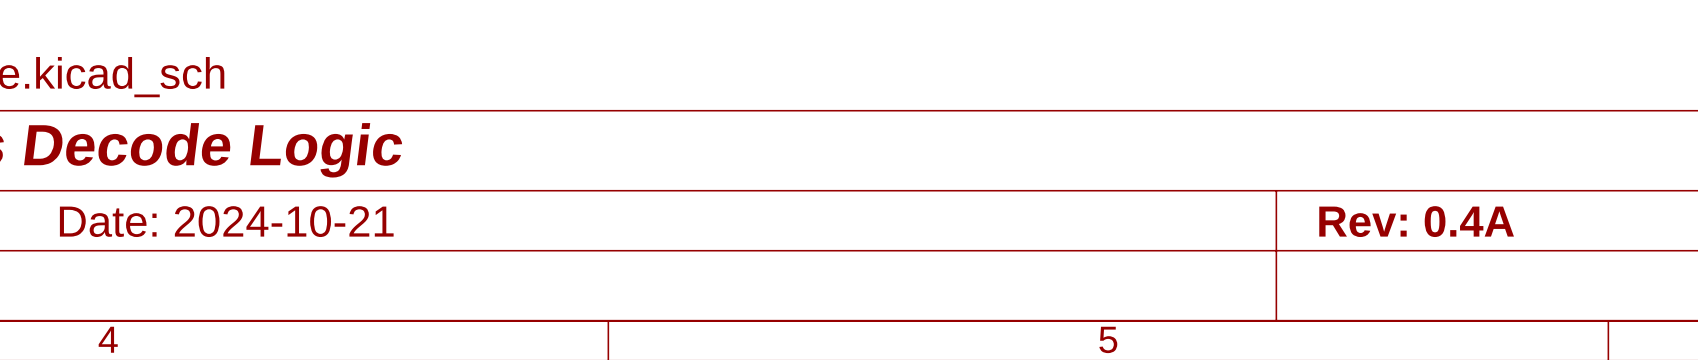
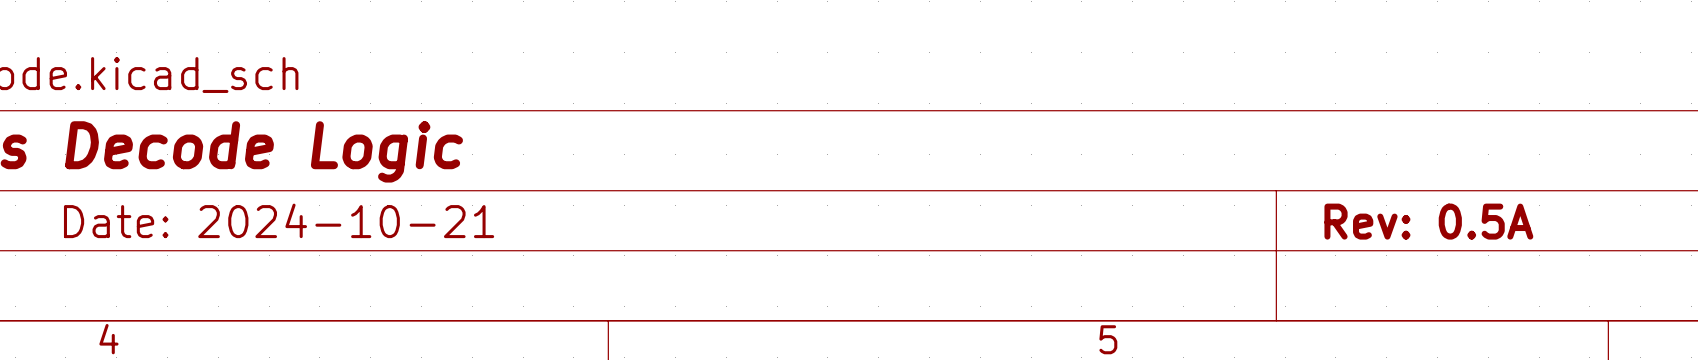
title block: Rev: 0.4A (1416, 221) -> Rev: 0.5A (1428, 221)

